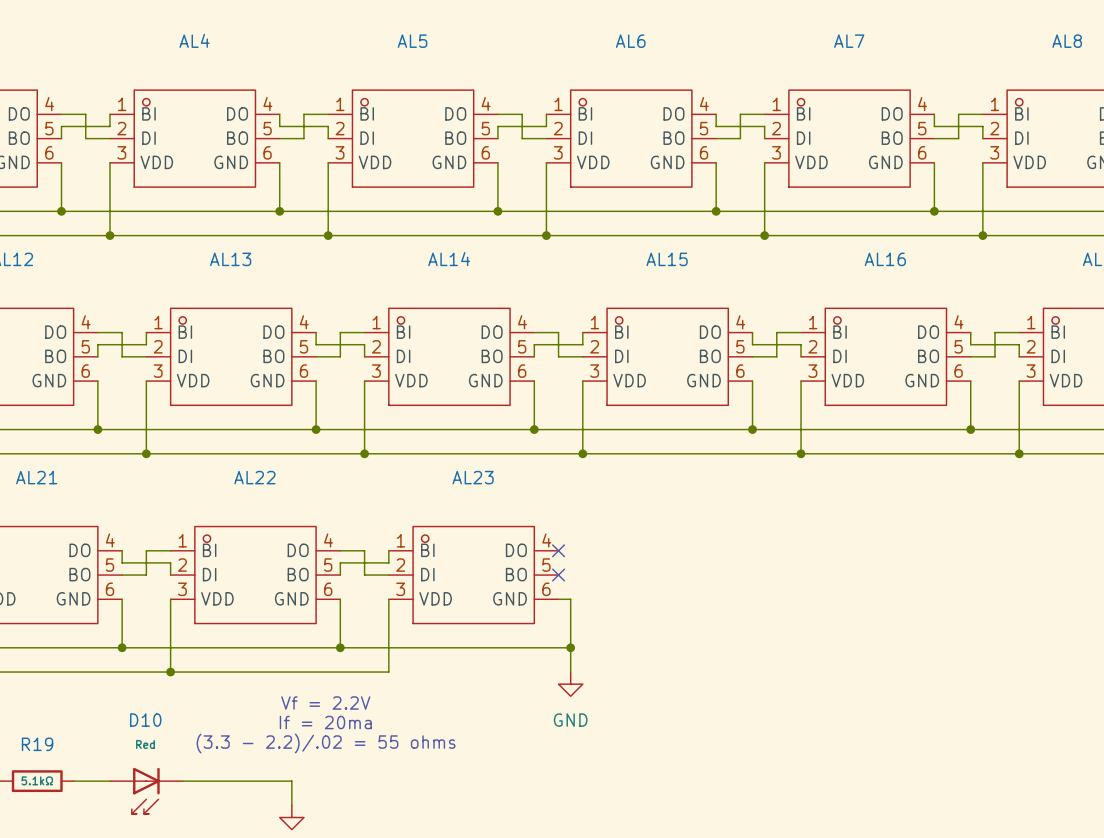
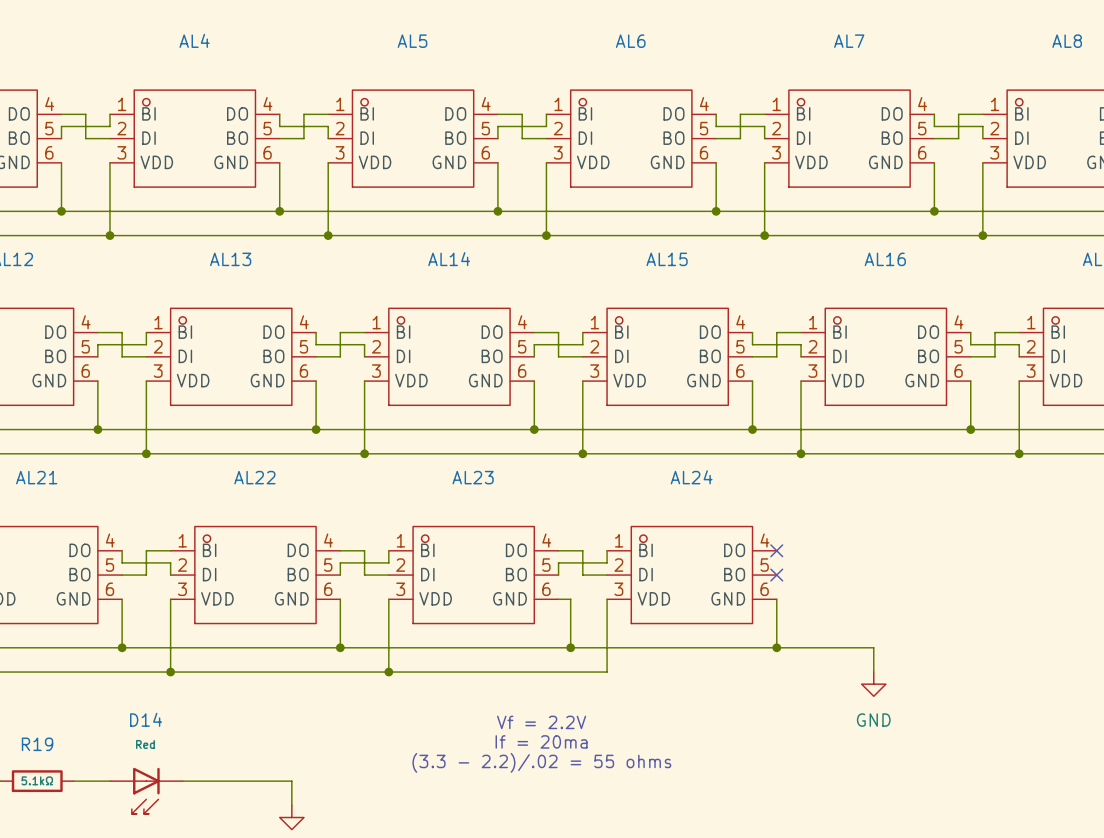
wire: none -> (558, 550) (582, 550) (582, 575) (607, 575)
no-connect mark: (558, 550) -> none
wire: none -> (607, 550) (607, 562) (558, 562) (558, 575)
no-connect mark: none -> (776, 550)
no-connect mark: (558, 575) -> none
AL24: none -> (691, 575)
no-connect mark: none -> (776, 575)
wire: none -> (607, 599) (607, 672) (388, 672)
wire: none -> (776, 599) (776, 647)
wire: (570, 647) (570, 672) -> (570, 647) (873, 647) (873, 672)
junction: none -> (776, 647)
junction: none -> (388, 672)
power symbol: GND (570, 684) -> none
power symbol: none -> GND (873, 684)
text position: Vf = 2.2V (325, 703) -> Vf = 2.2V (541, 722)
D10 name: D10 (145, 720) -> D14 (146, 719)
text position: If = 20ma (325, 722) -> If = 20ma (541, 741)
text position: (3.3 - 2.2)/.02 = 55 ohms (326, 743) -> (3.3 - 2.2)/.02 = 55 ohms (541, 762)

